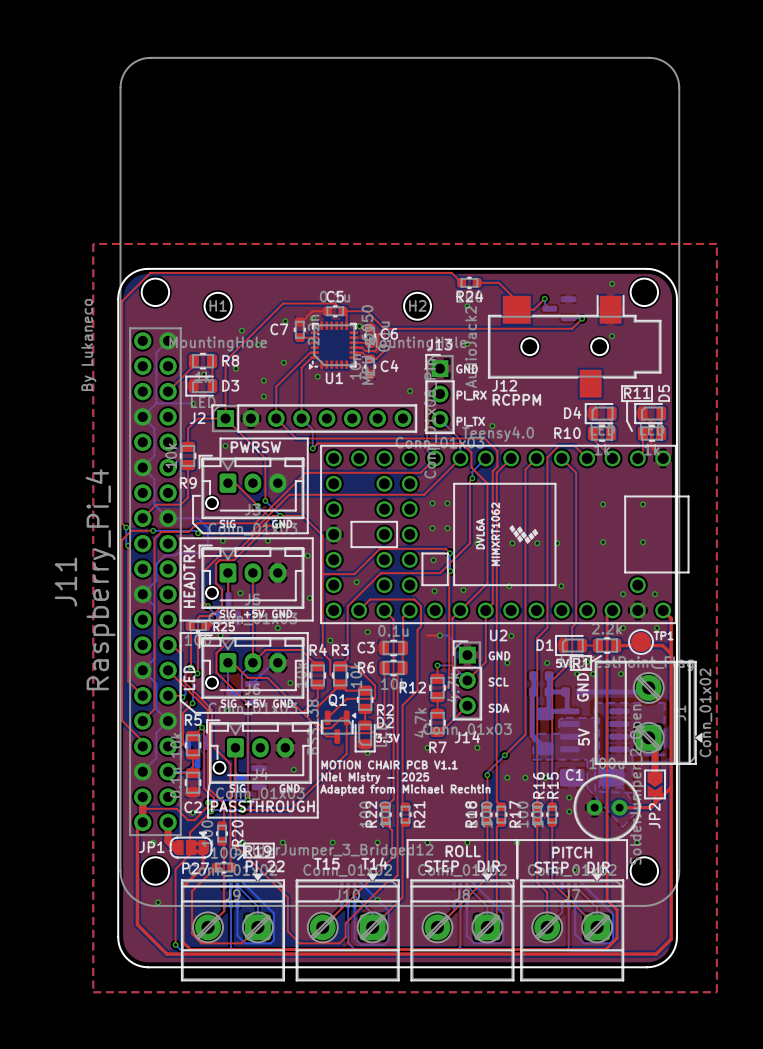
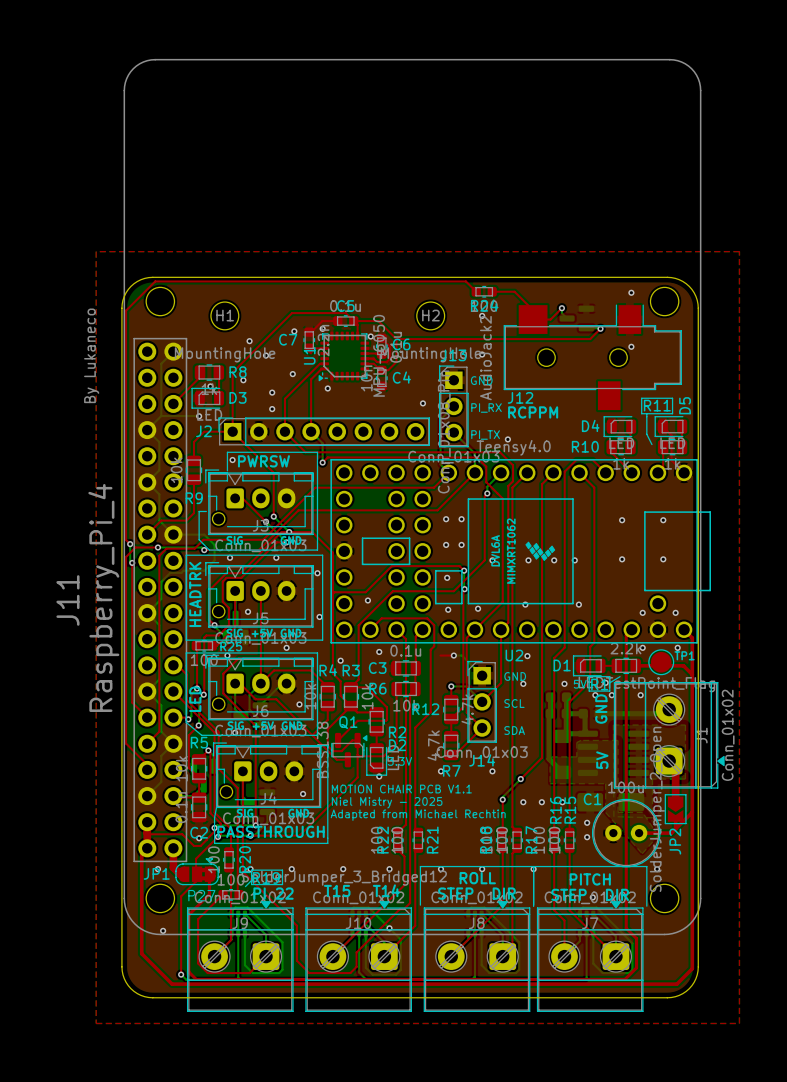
top track: none -> (309, 352) (311, 353)
U1 name rotation: 0° (334, 378) -> 90° counterclockwise (309, 355)
U1 name position: U1 (334, 378) -> U1 (309, 355)

